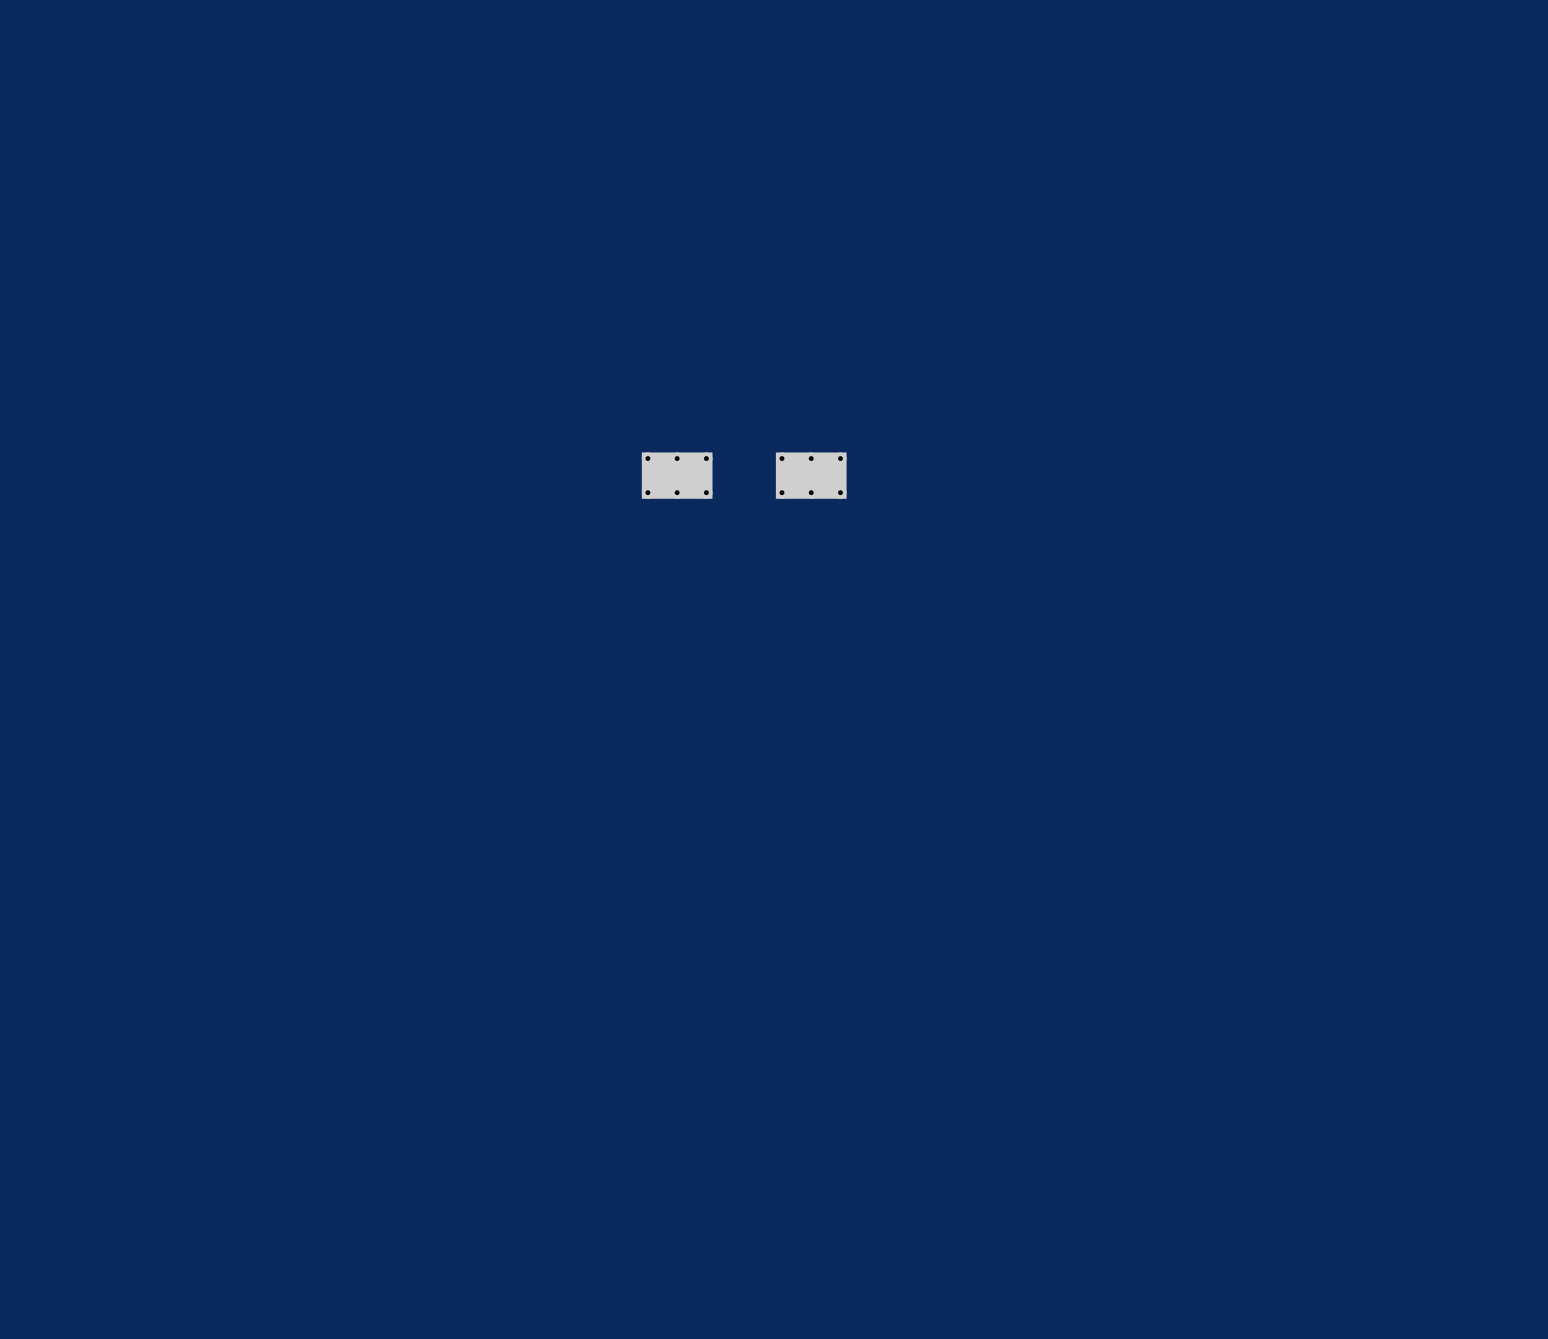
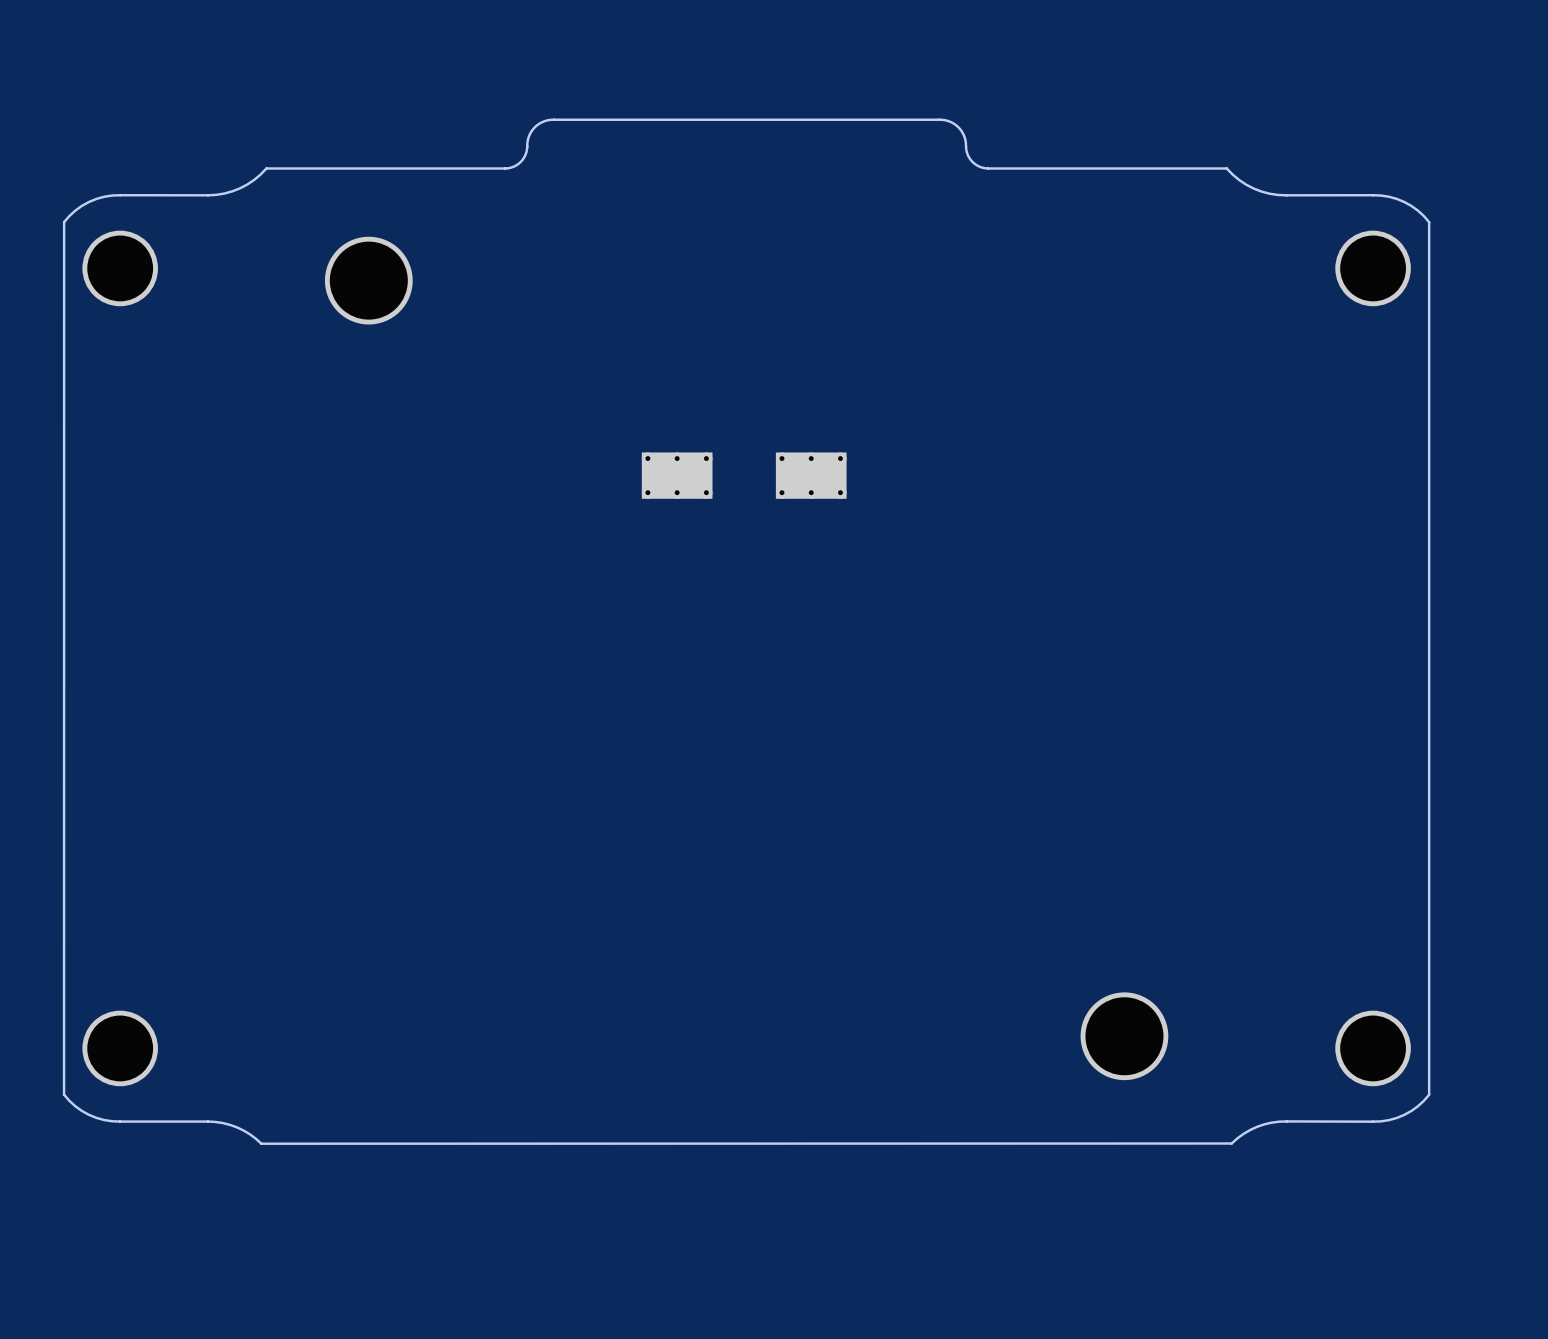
board edge: none -> (939, 119) (551, 119) (539, 123) (532, 129) (528, 137) (524, 157) (518, 163) (508, 168) (266, 168) (247, 184) (224, 193) (112, 195) (88, 201) (69, 216) (64, 222) (64, 1094) (75, 1106) (88, 1114) (112, 1121) (222, 1123) (243, 1130) (261, 1143) (1231, 1143) (1250, 1130) (1271, 1122) (1381, 1121) (1404, 1114) (1423, 1100) (1429, 1094) (1429, 222) (1411, 205) (1389, 196) (1269, 193) (1246, 184) (1226, 168) (985, 168) (977, 165) (969, 157) (964, 137) (958, 127) (951, 122) (939, 119)
part: none -> (120, 268)
part: none -> (1373, 268)
part: none -> (368, 280)
part: none -> (1124, 1036)
part: none -> (120, 1048)
part: none -> (1373, 1048)

